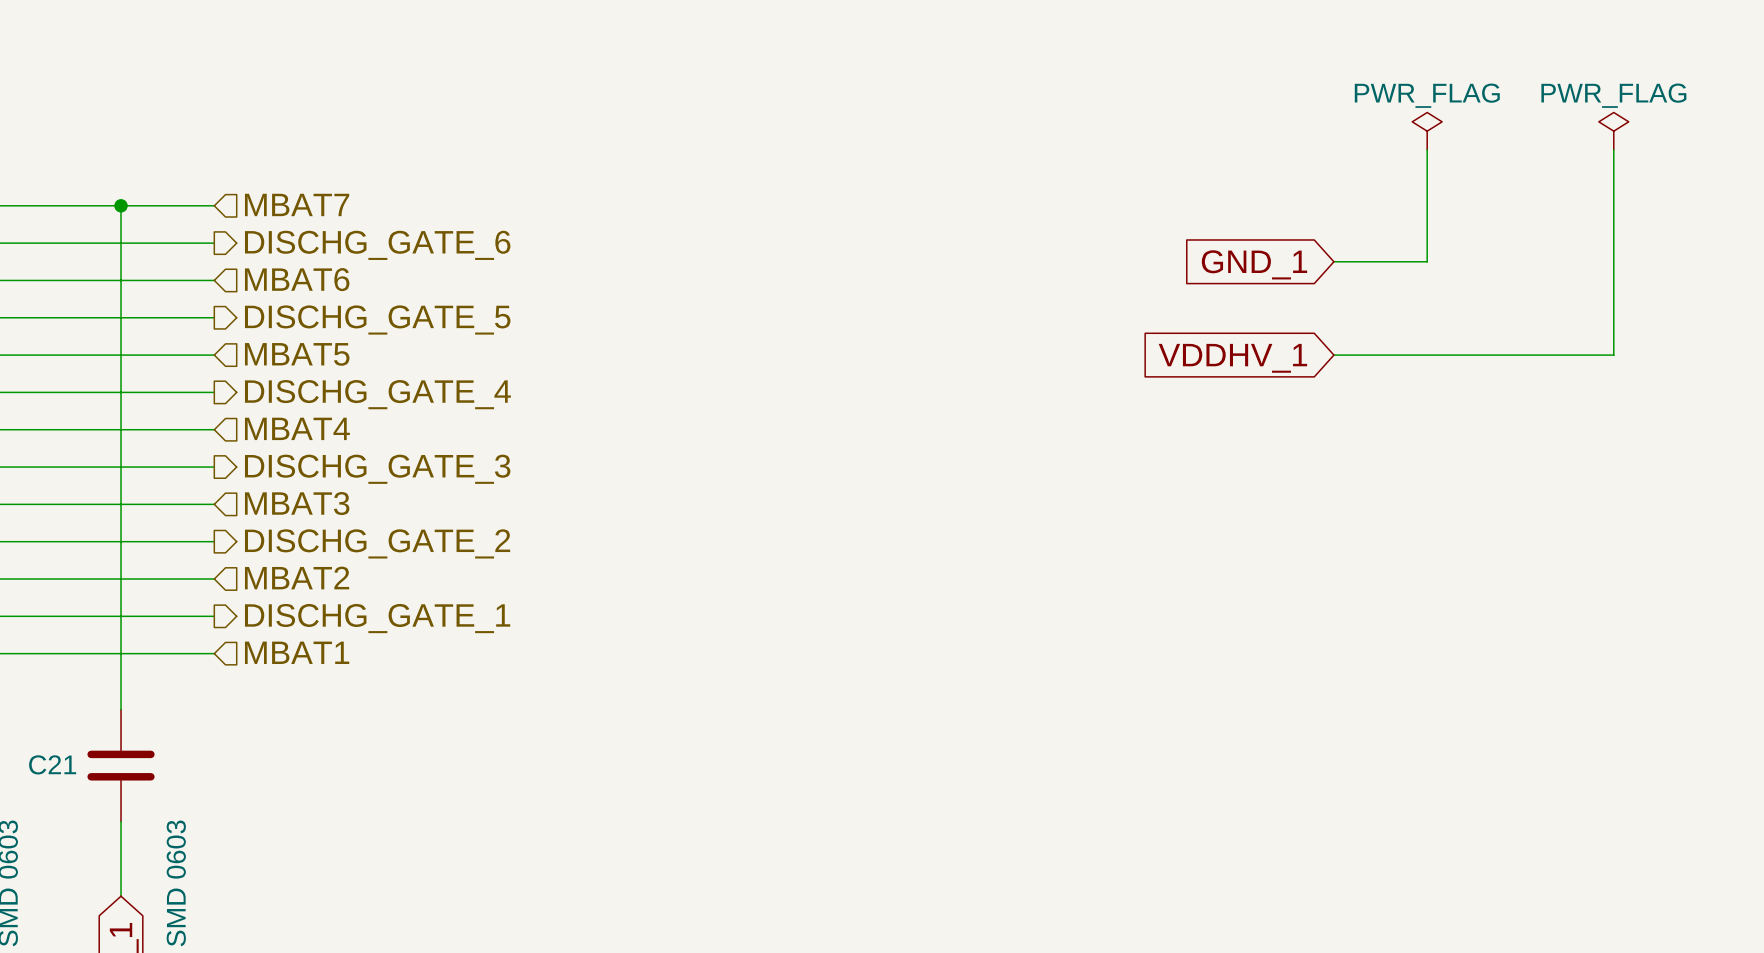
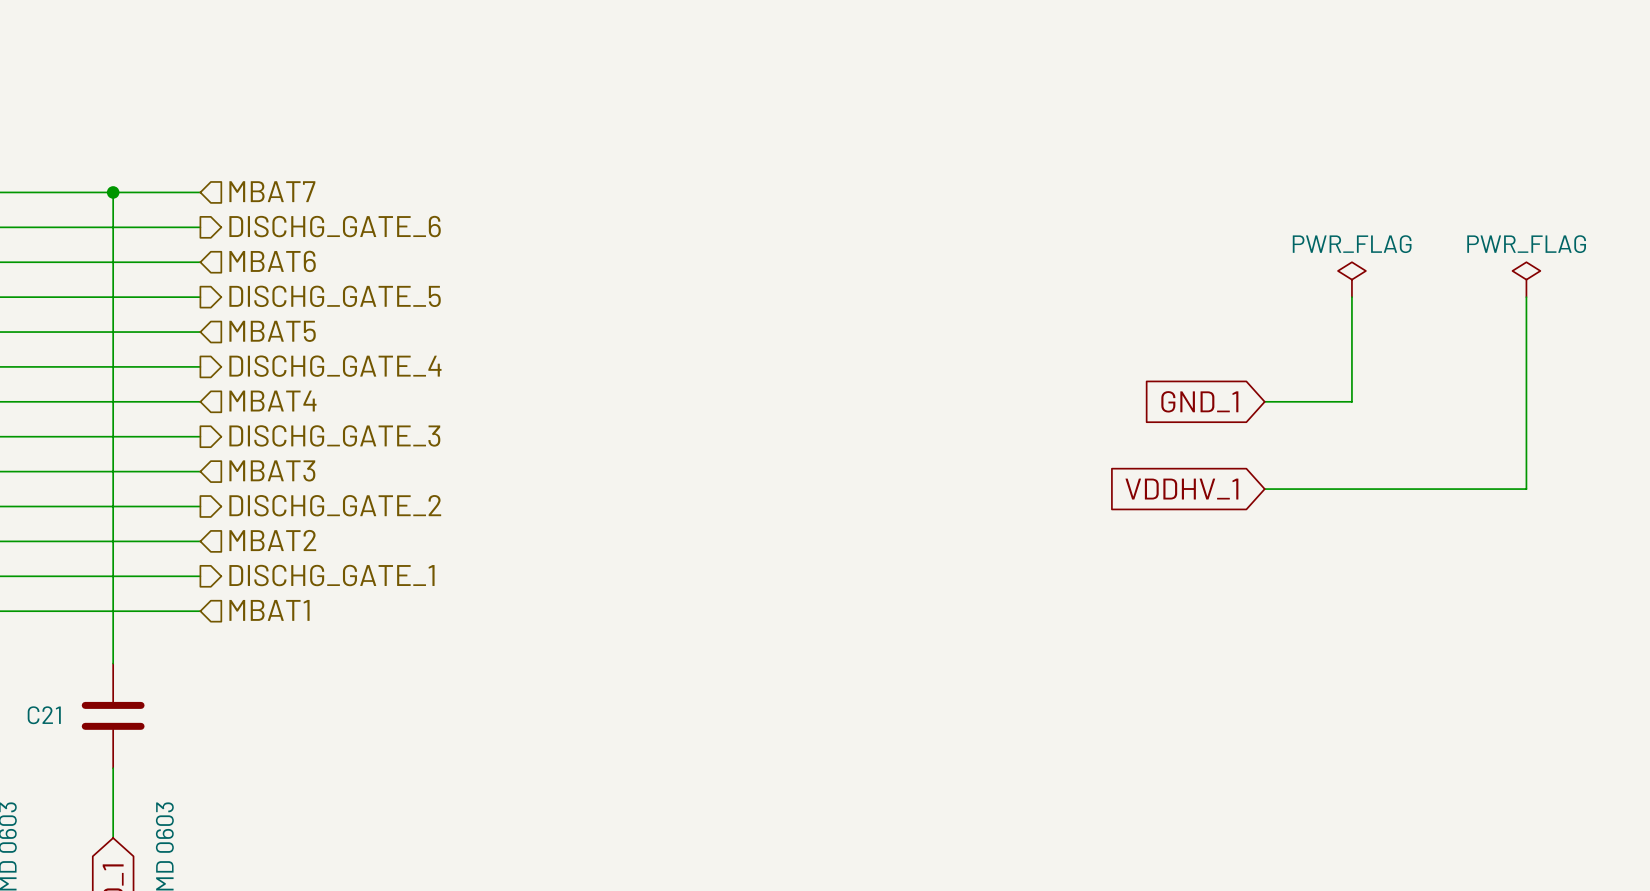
power symbol: PWR_FLAG (1427, 131) -> none
power symbol: PWR_FLAG (1613, 131) -> none
wire: (1427, 149) (1427, 261) (1333, 261) -> (1351, 297) (1351, 401) (1264, 401)
wire: (1613, 149) (1613, 355) (1333, 355) -> (1526, 297) (1526, 489) (1264, 489)
global label position: GND_1 (1254, 264) -> GND_1 (1199, 401)
power symbol: none -> PWR_FLAG (1351, 279)
power symbol: none -> PWR_FLAG (1526, 279)
global label position: VDDHV_1 (1232, 358) -> VDDHV_1 (1181, 489)

